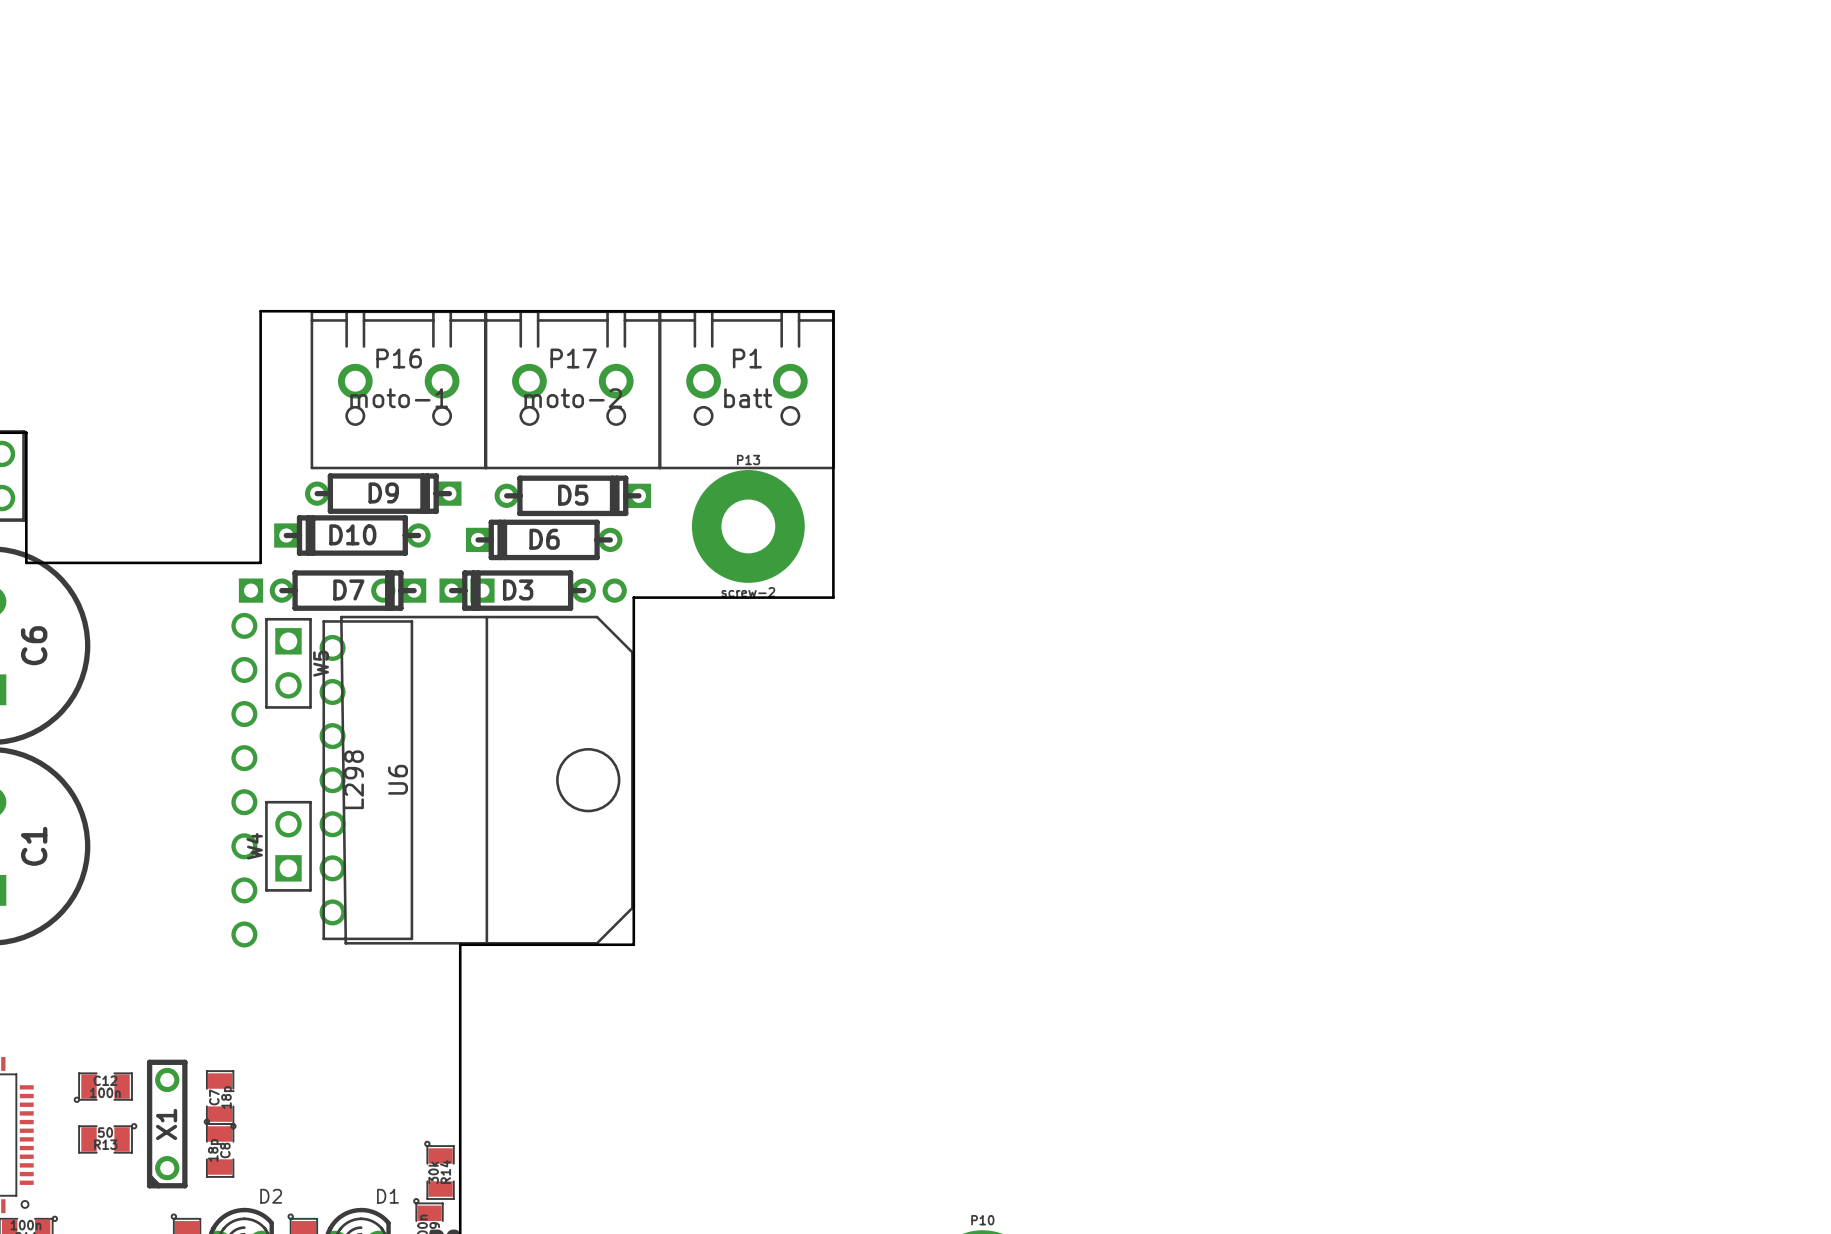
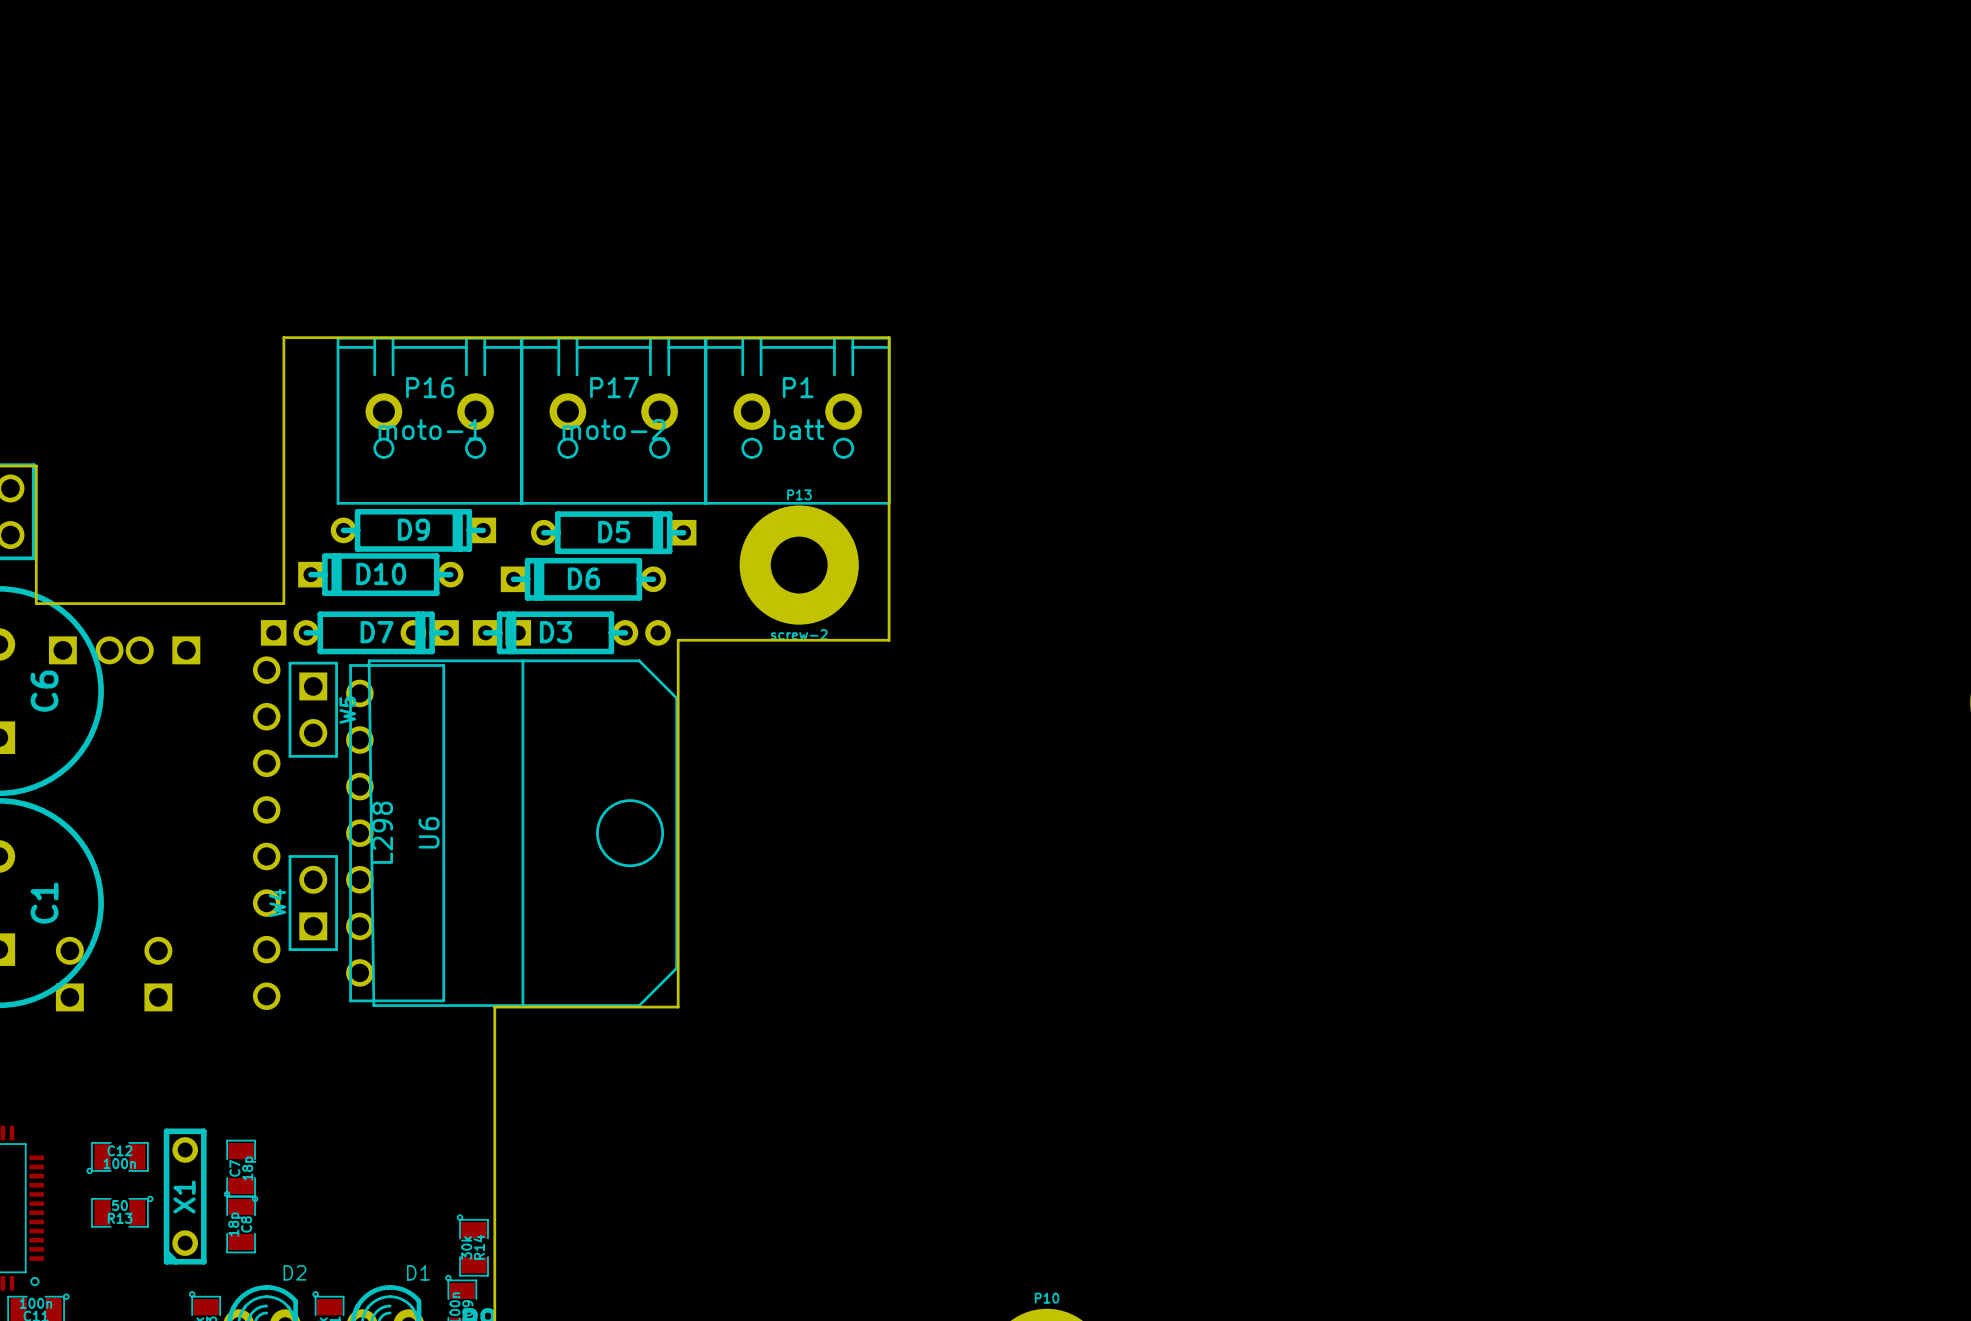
part: none -> (86, 650)
part: none -> (163, 650)
part: none -> (69, 974)
part: none -> (158, 974)

